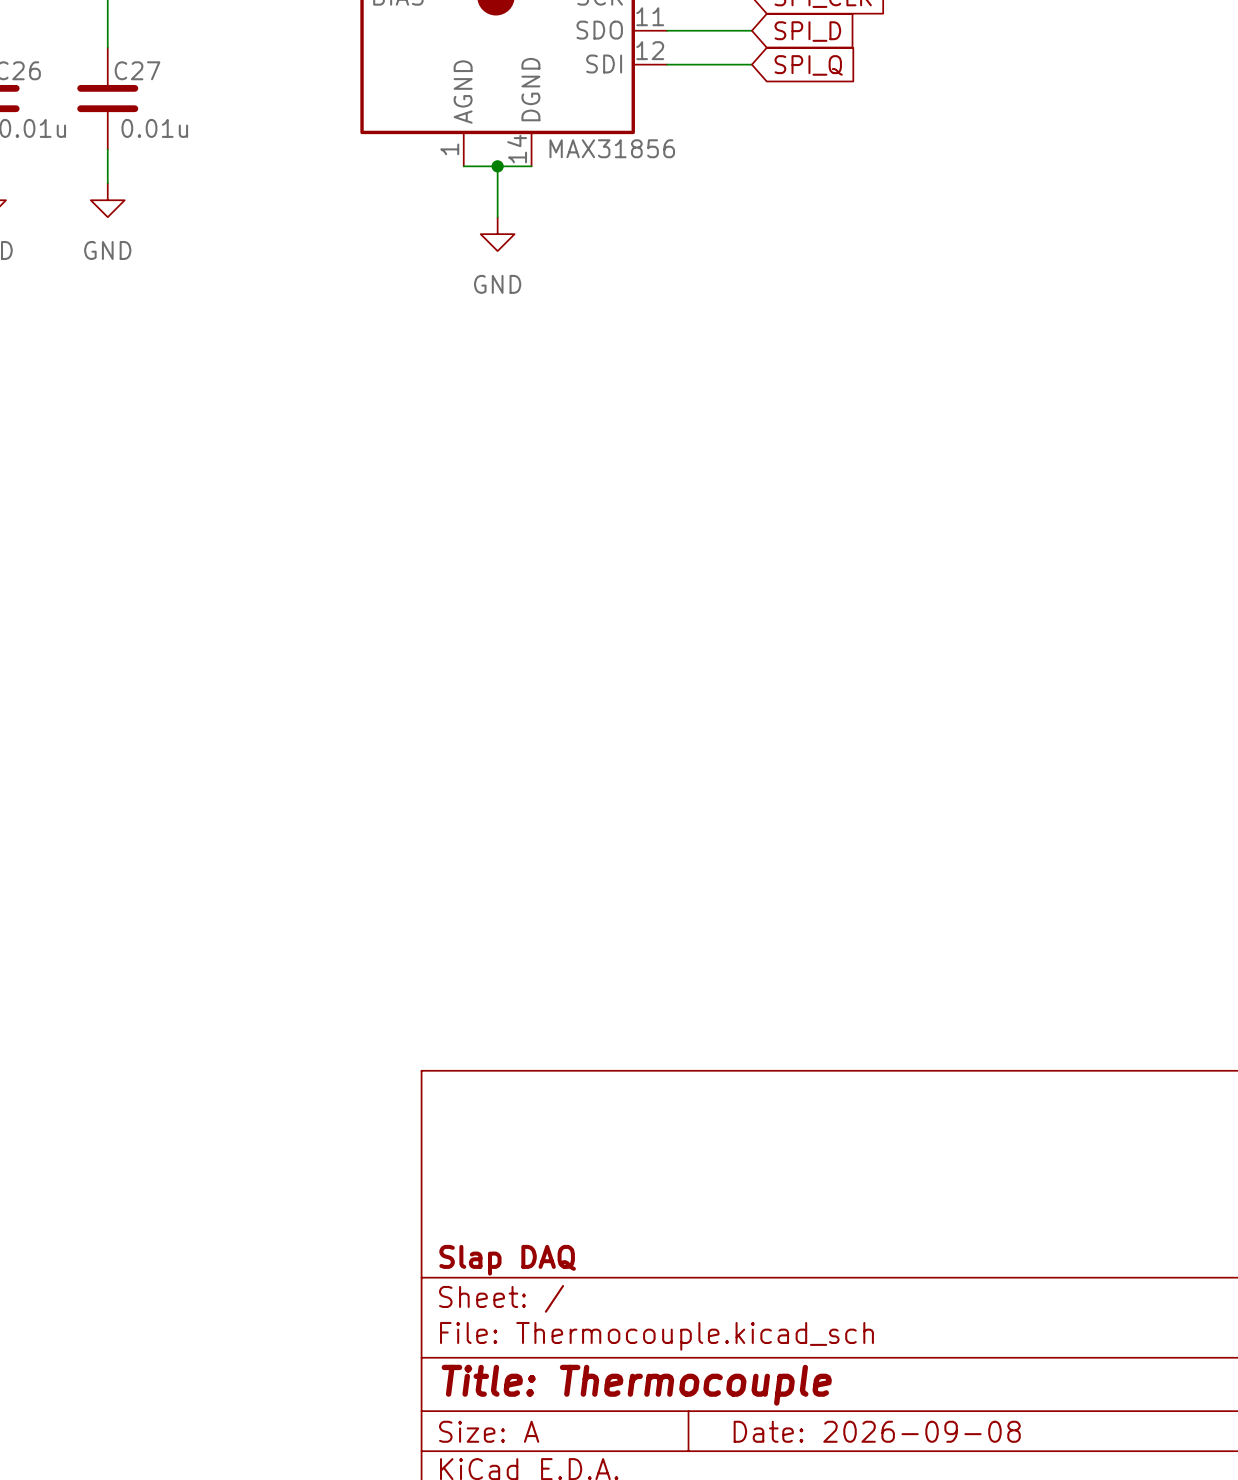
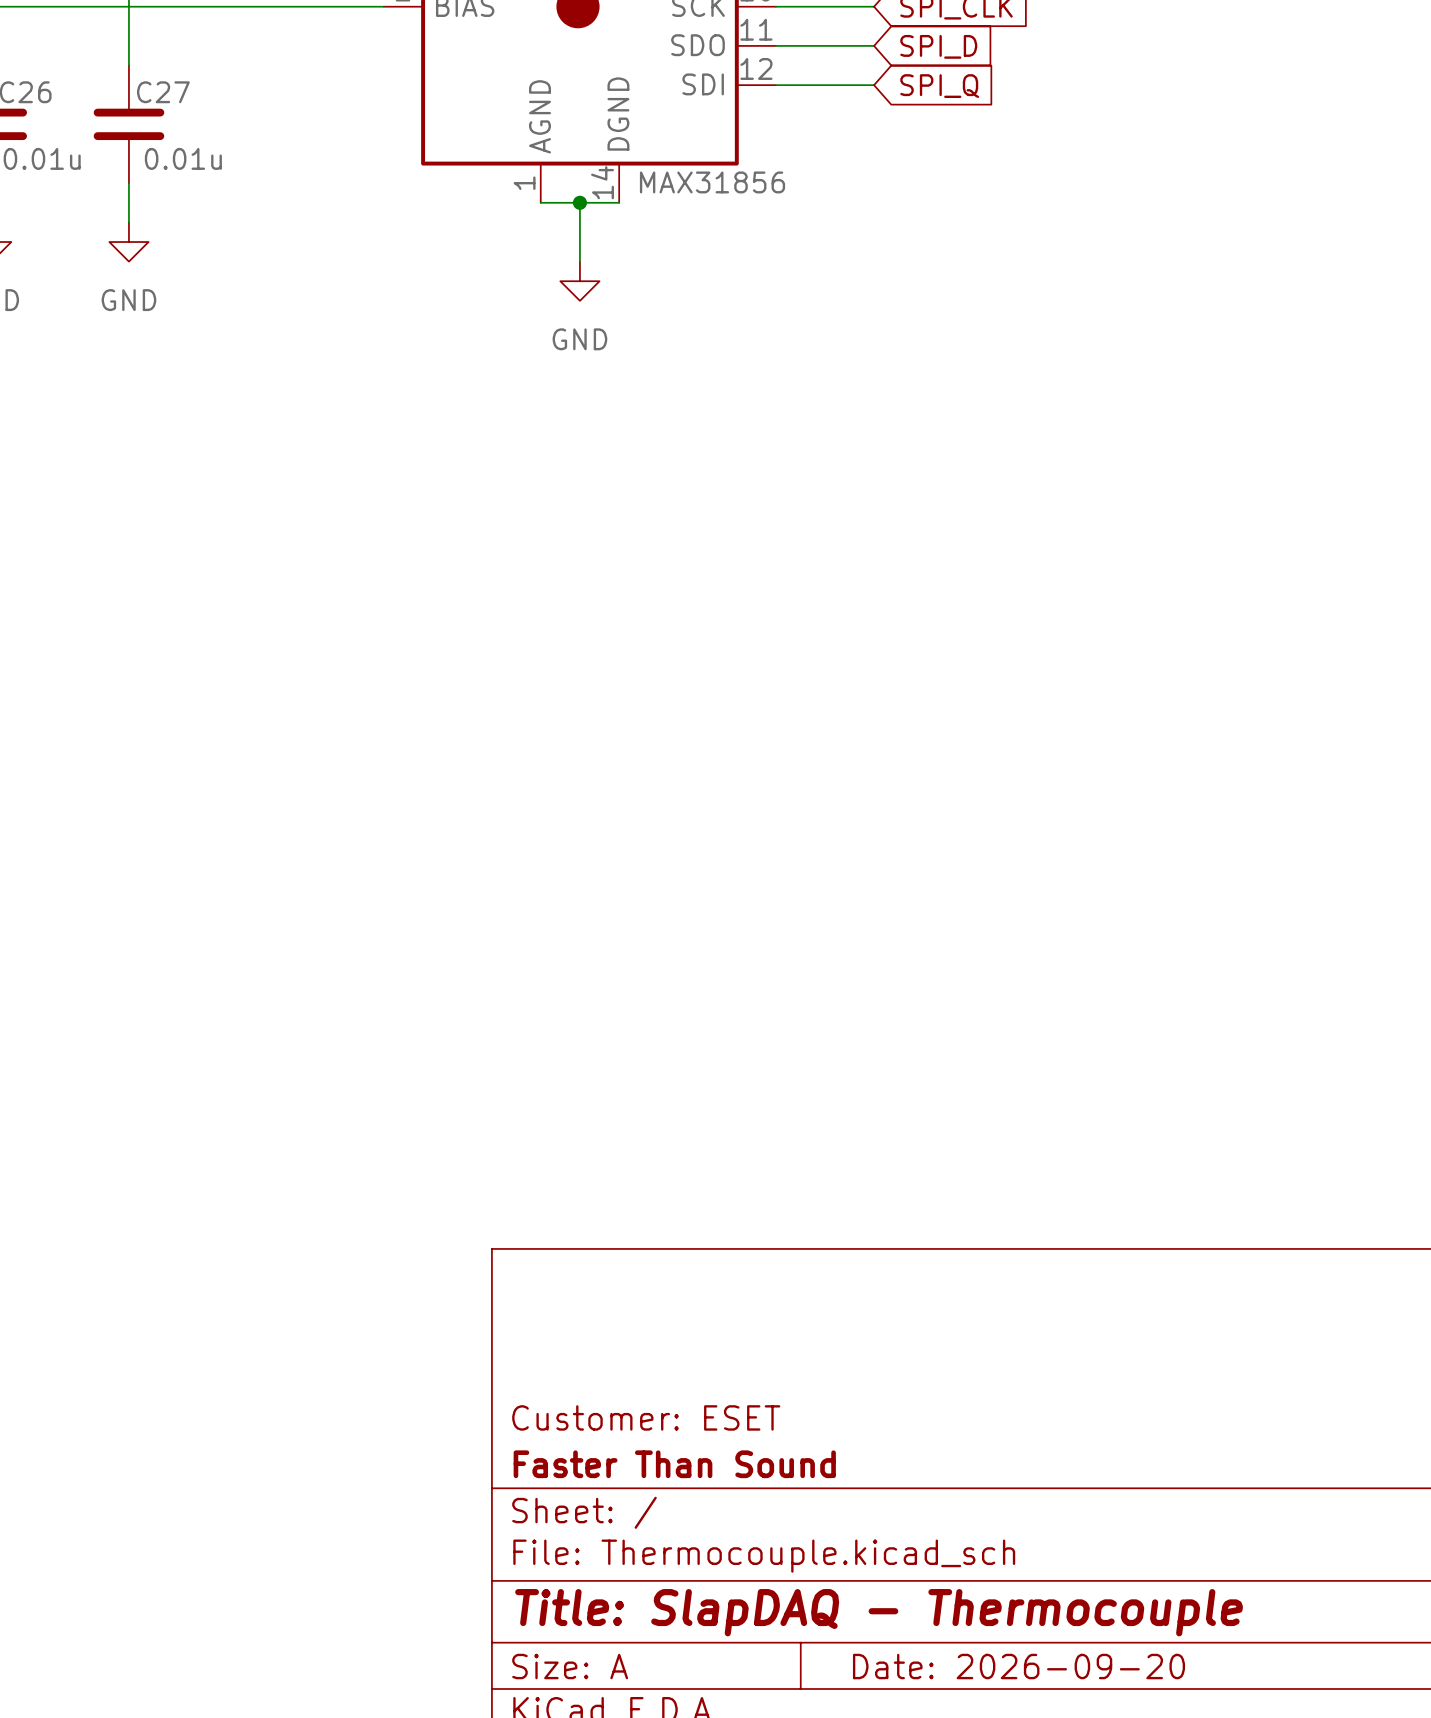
title block: none -> Customer: ESET (646, 1417)
title block: Slap DAQ (507, 1260) -> Faster Than Sound (674, 1464)
title block: Title: Thermocouple (636, 1385) -> Title: SlapDAQ - Thermocouple (879, 1612)
title block: Date: 2026-09-08 (877, 1431) -> Date: 2026-09-20 (1018, 1666)

